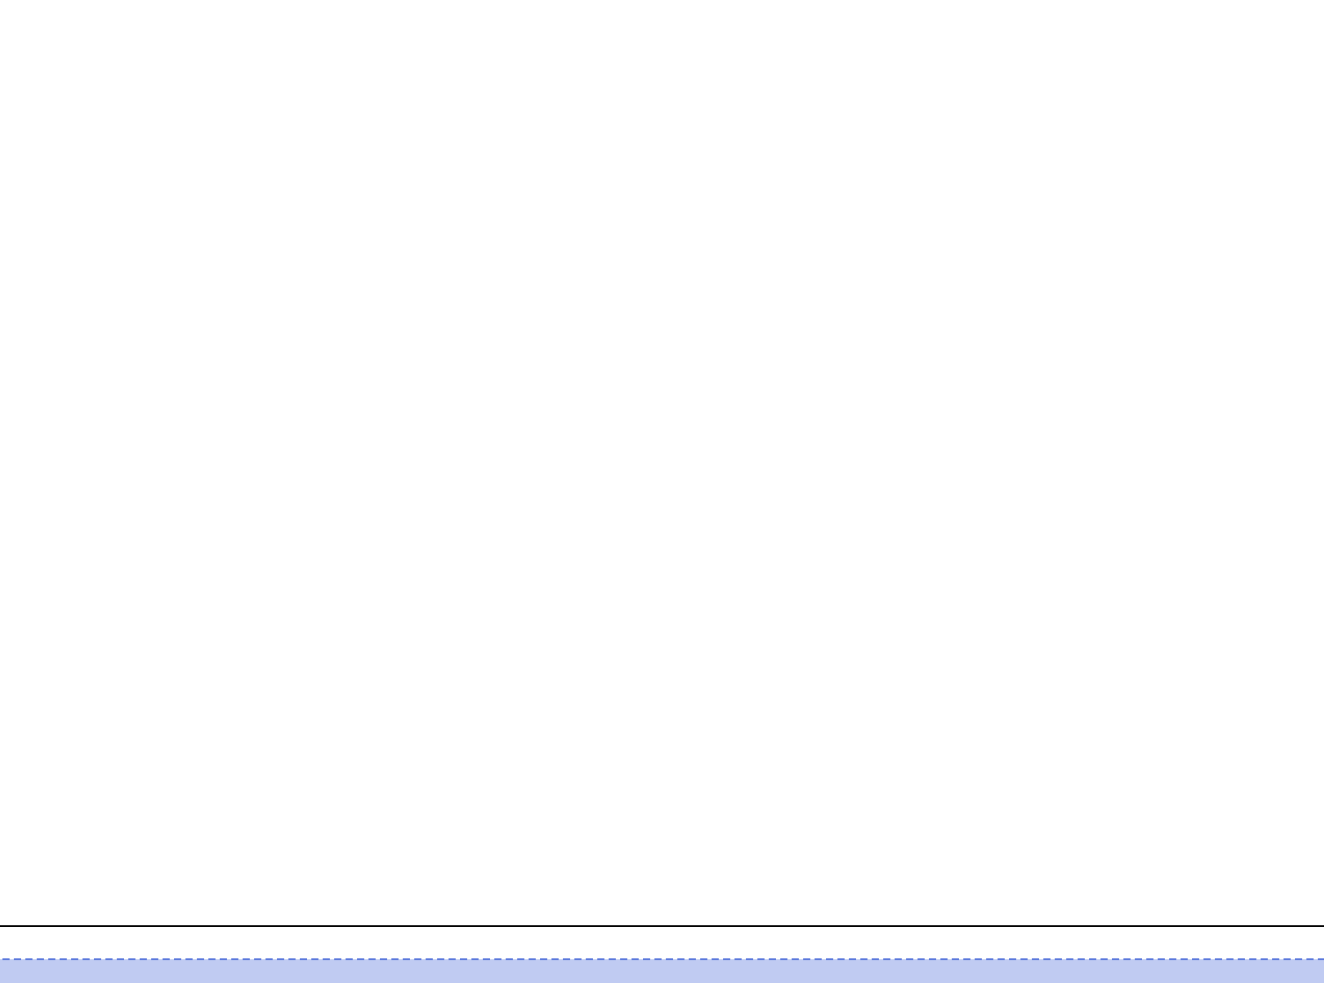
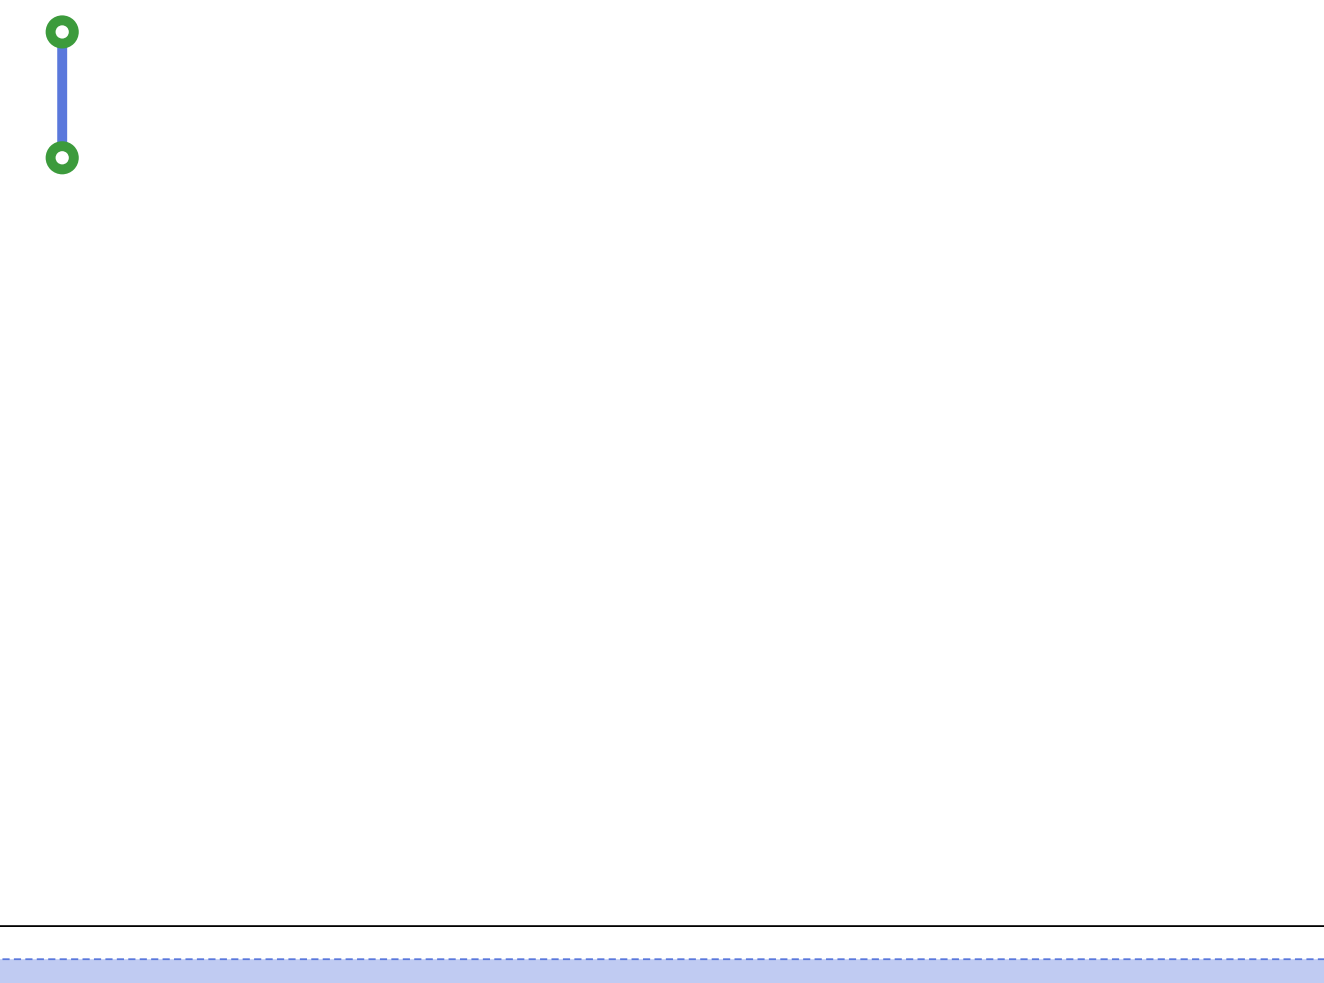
track: none -> (62, 31) (62, 157)
via: none -> (62, 31)
via: none -> (62, 157)

